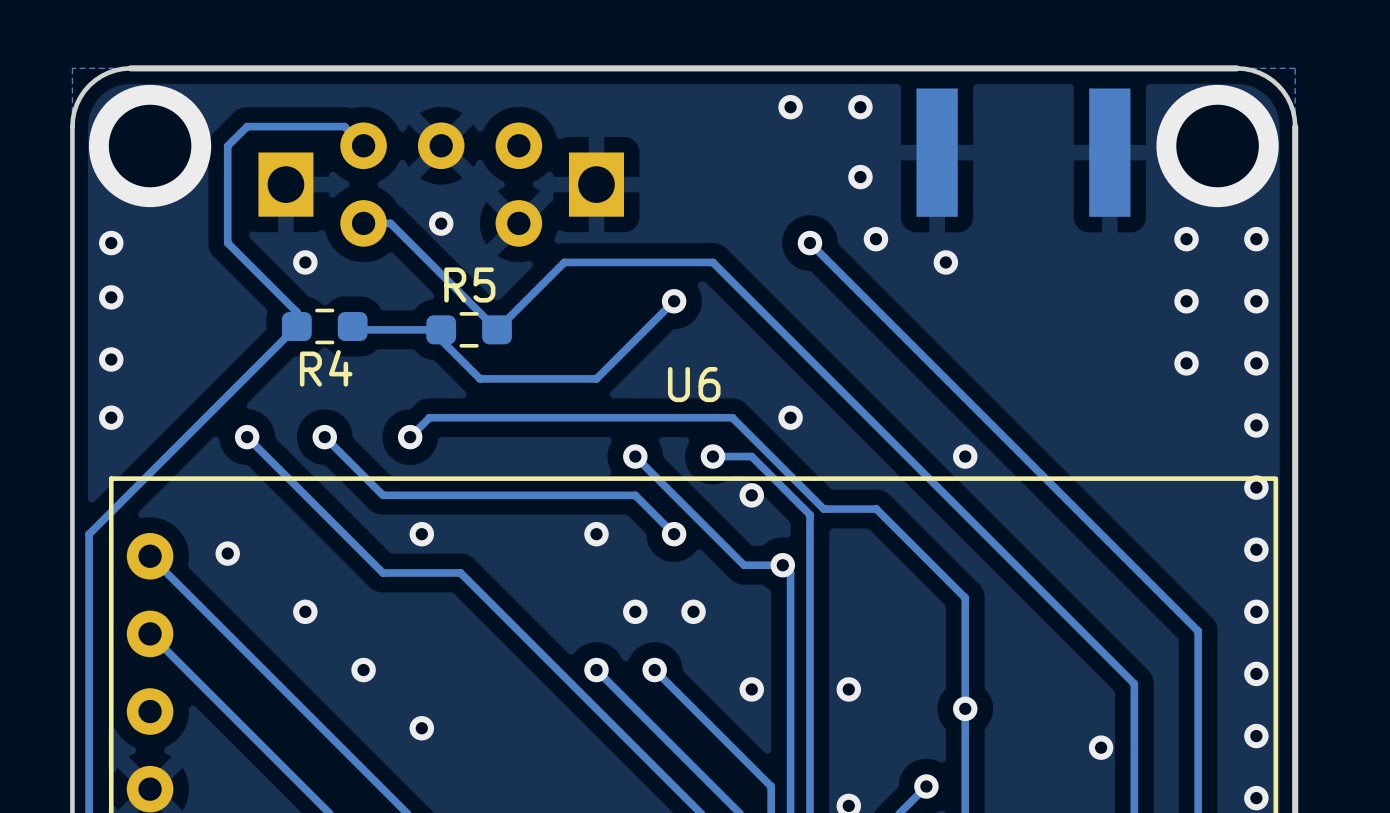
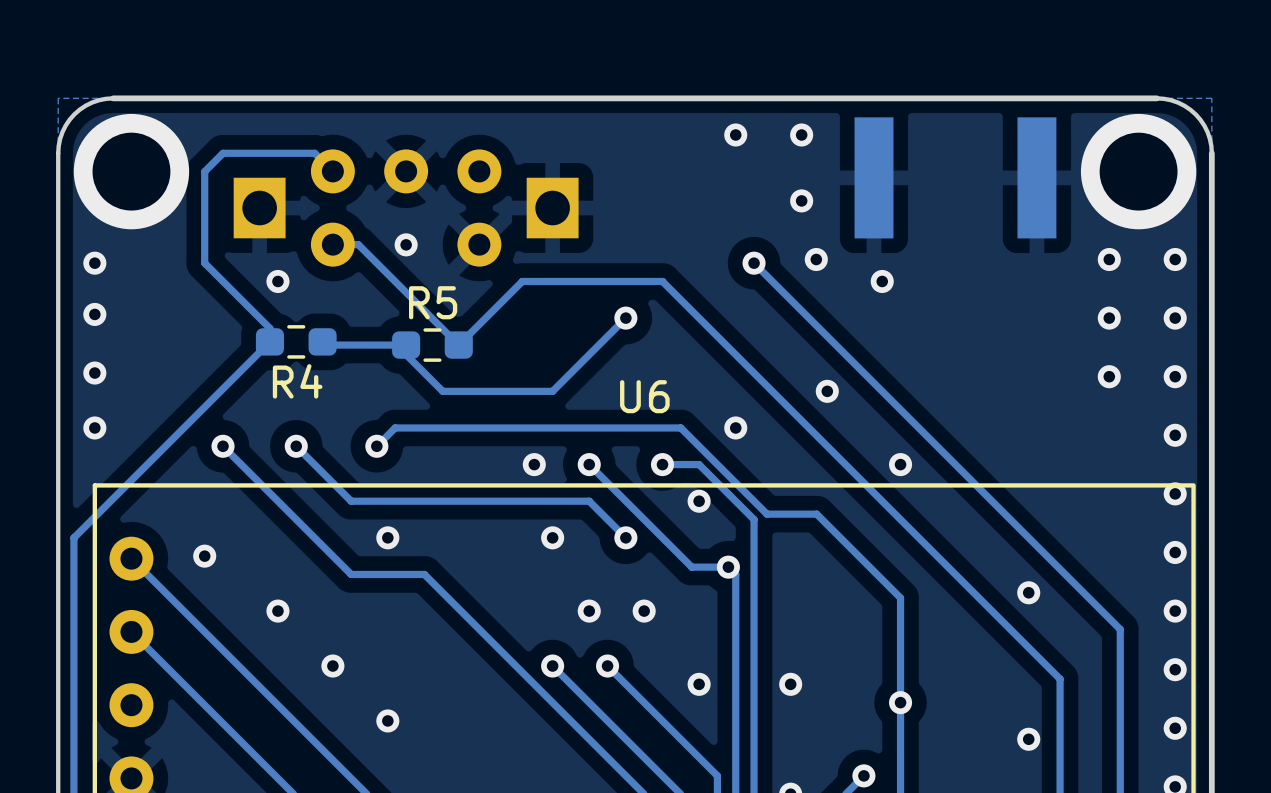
via: none -> (827, 391)
via: none -> (534, 464)
via: none -> (1028, 592)

